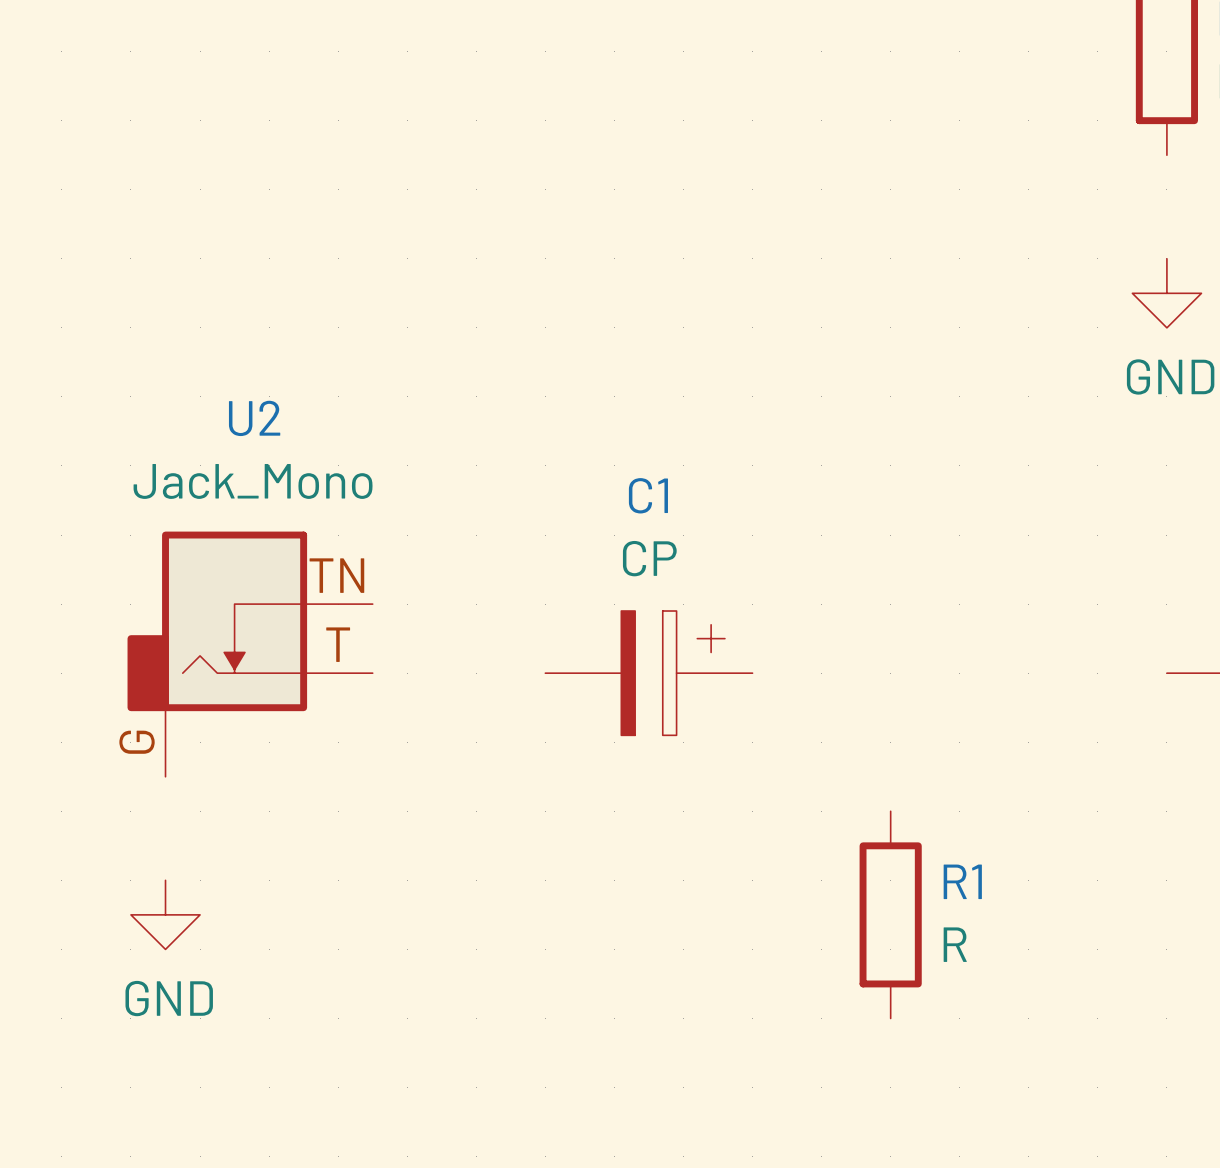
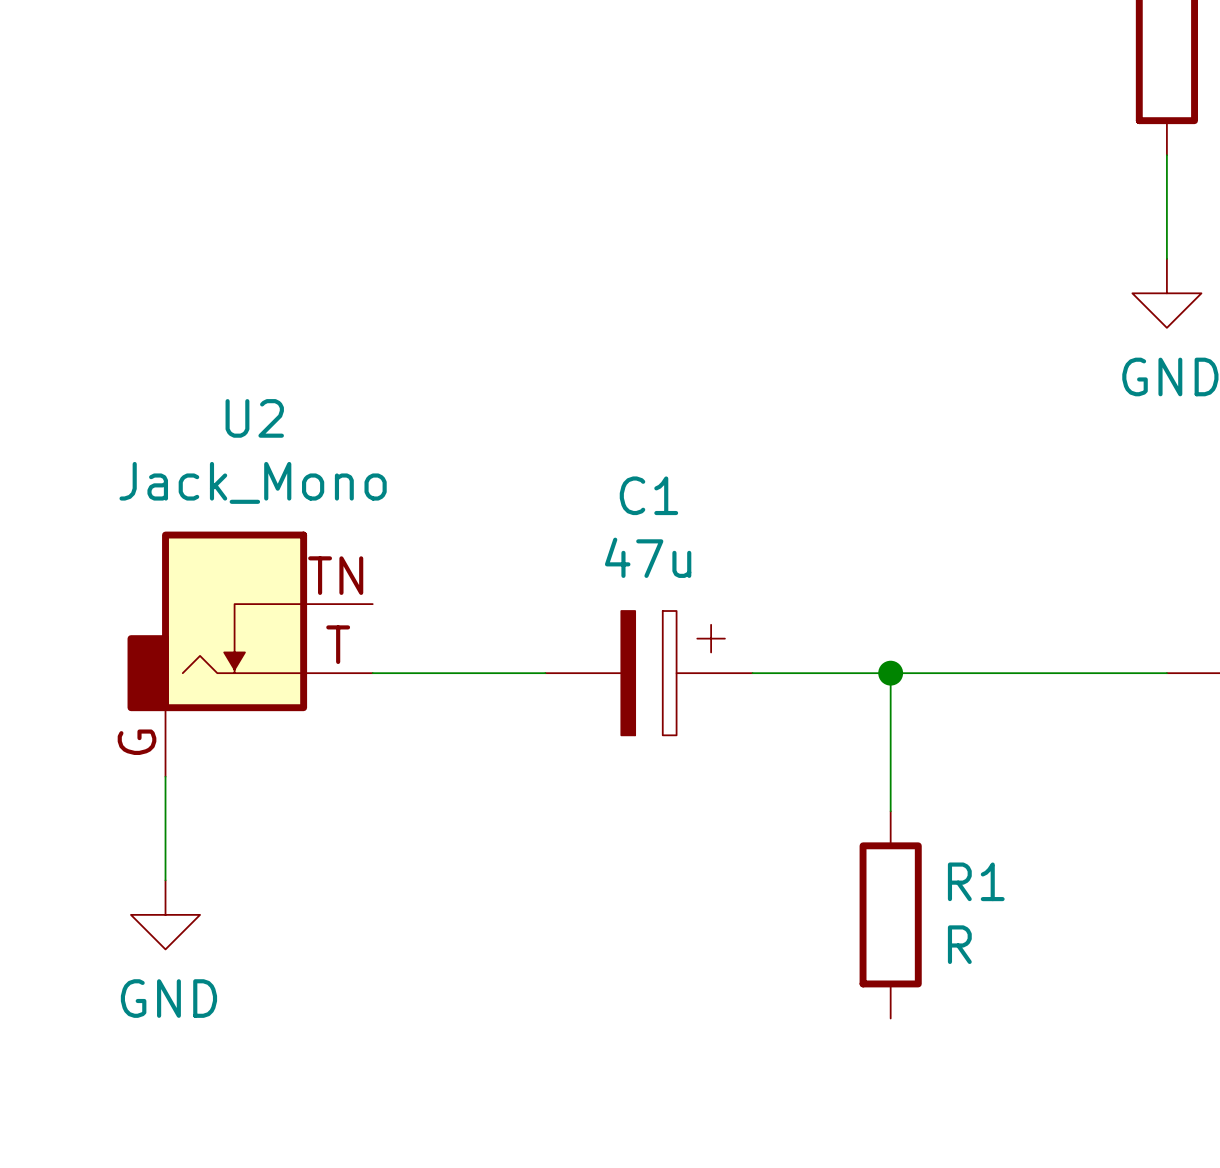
wire: none -> (1166, 155) (1166, 258)
C1 value: CP (649, 558) -> 47u (648, 557)
wire: none -> (372, 673) (545, 673)
wire: none -> (752, 673) (1166, 673)
wire: none -> (890, 673) (890, 811)
junction: none -> (890, 673)
wire: none -> (165, 776) (165, 880)

